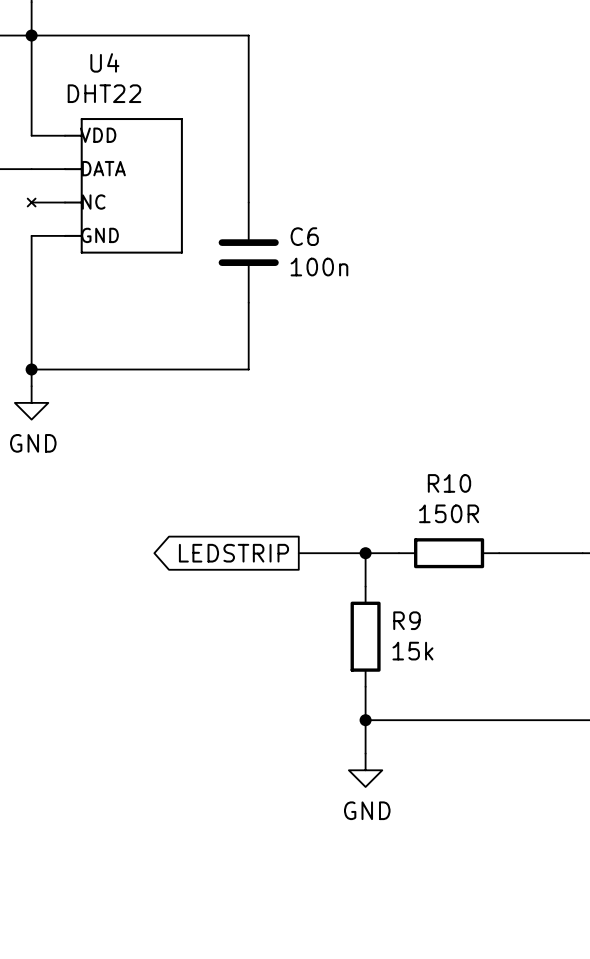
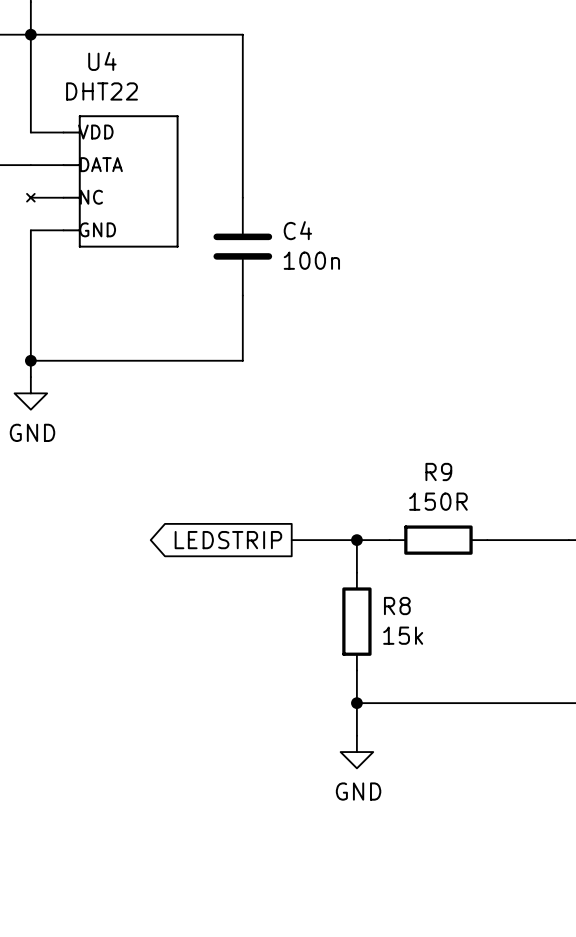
C6 name: C6 (304, 236) -> C4 (297, 230)
R10 name: R10 (449, 483) -> R9 (438, 471)
R9 name: R9 (406, 620) -> R8 (397, 606)

